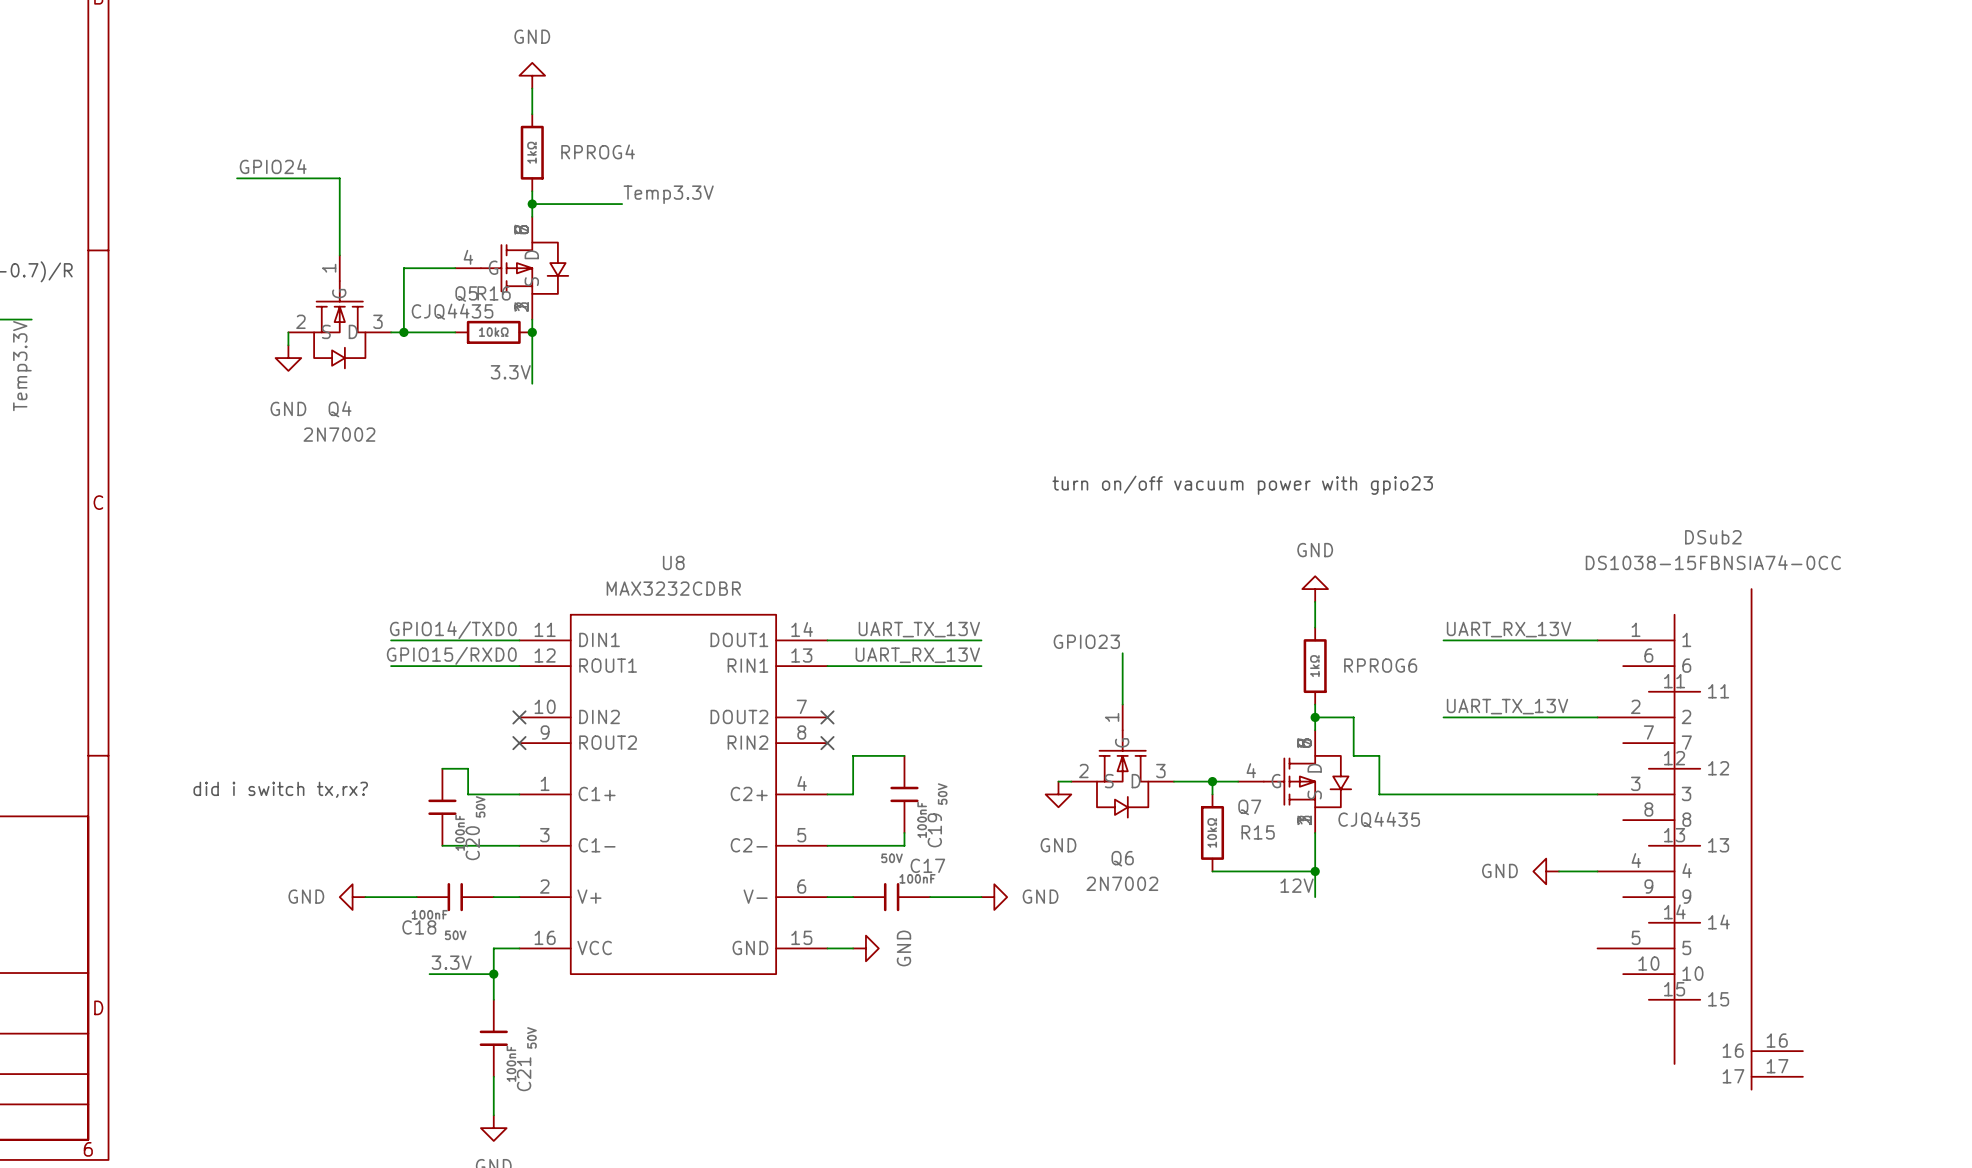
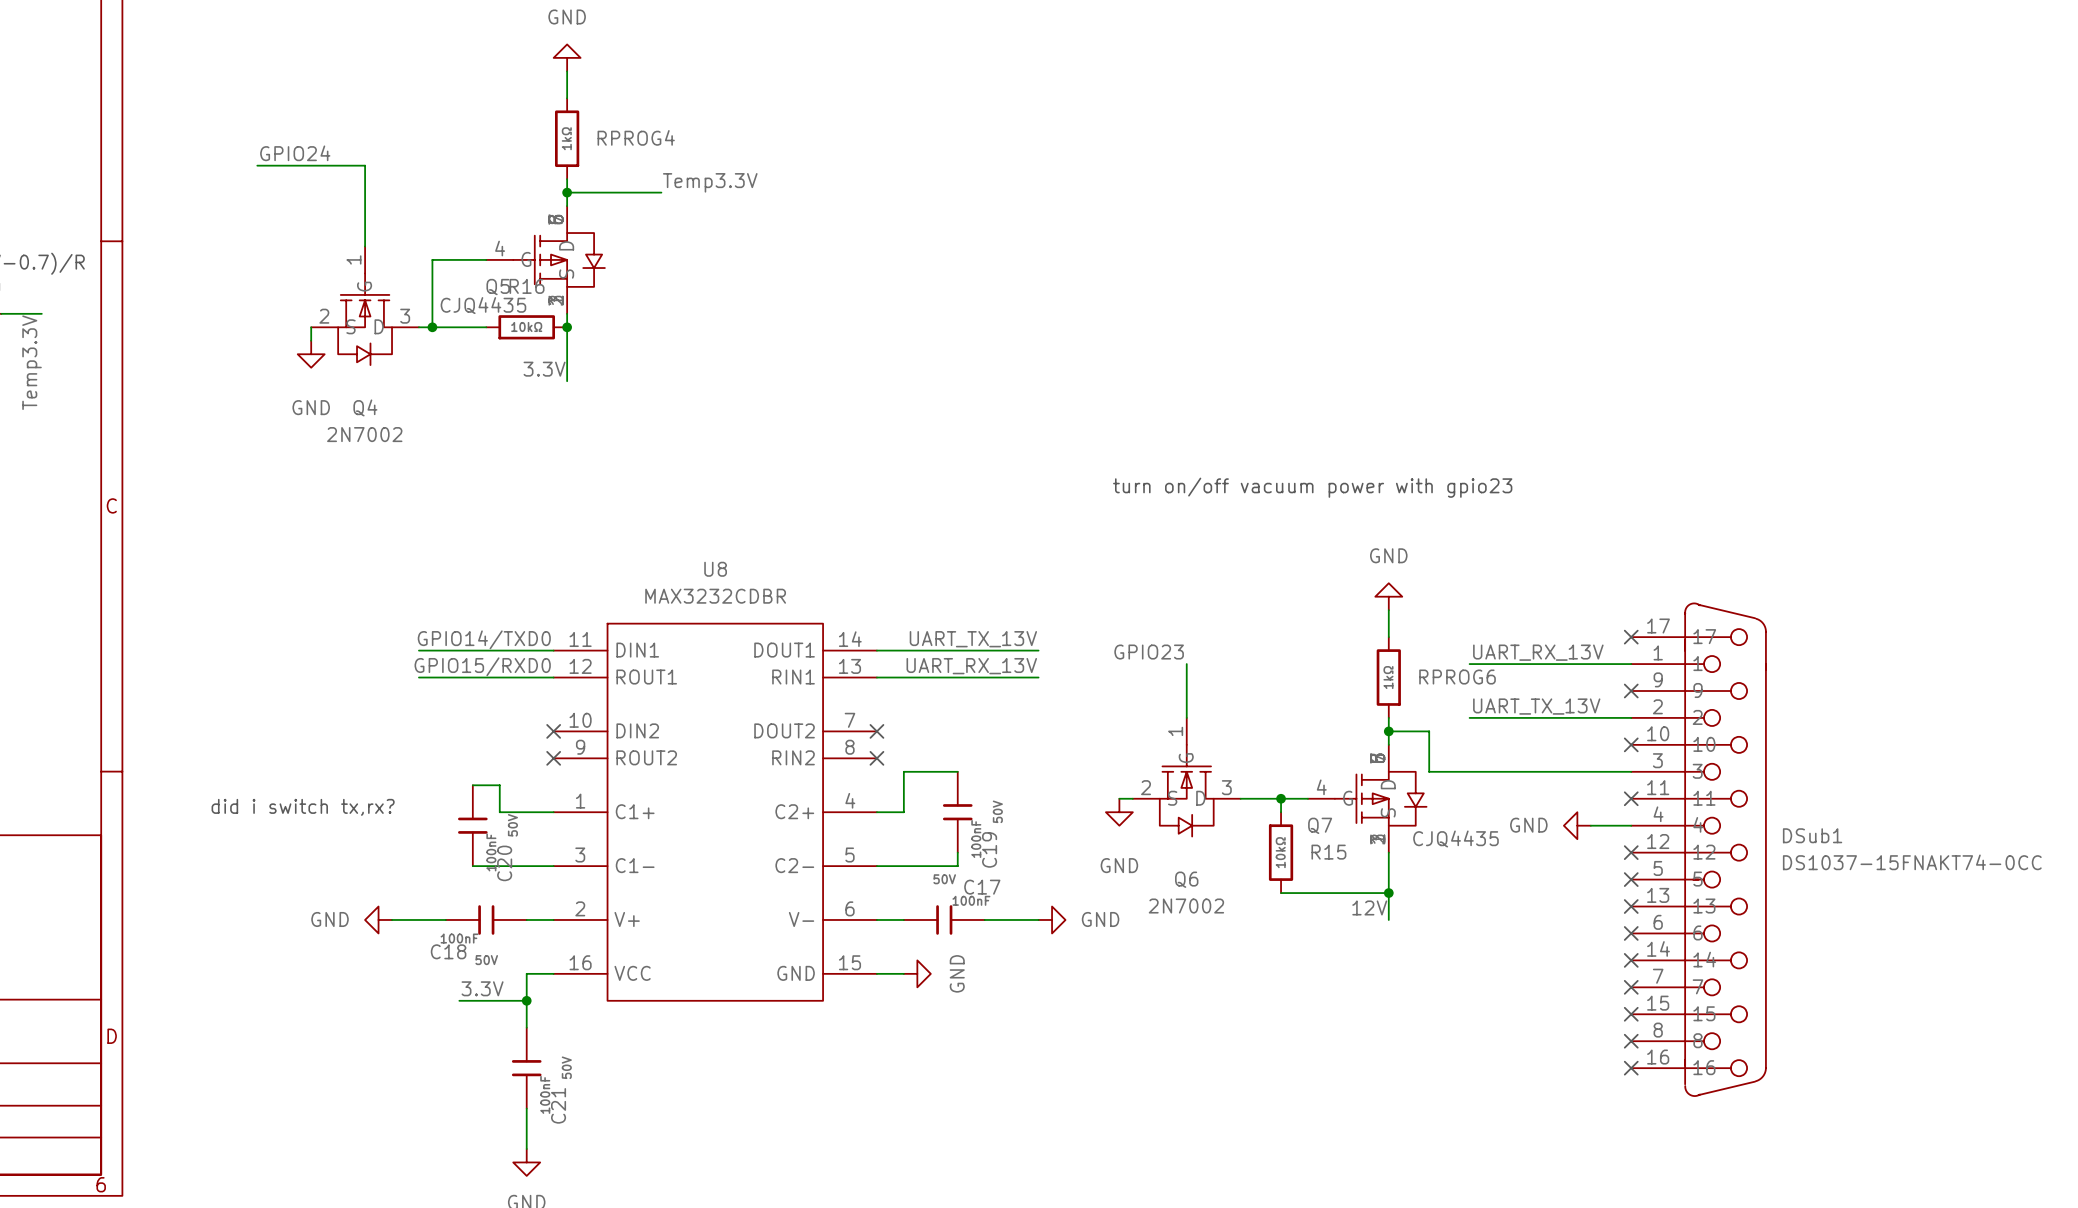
no-connect mark: none -> (1631, 637)
label position: UART_RX_13V (1509, 629) -> UART_RX_13V (1538, 652)
wire: (1443, 640) (1597, 640) -> (1469, 717) (1631, 717)
no-connect mark: none -> (1631, 691)
label position: UART_TX_13V (1507, 706) -> UART_TX_13V (1536, 706)
wire: (1443, 717) (1597, 717) -> (1469, 664) (1631, 664)
no-connect mark: none -> (1631, 744)
wire: (1379, 755) (1379, 794) (1597, 794) -> (1456, 771) (1631, 771)
no-connect mark: none -> (1631, 798)
DSub1: none -> DS1037-15FNAKT74-0CC (1698, 849)
no-connect mark: none -> (1631, 852)
DSub2: DS1038-15FBNSIA74-0CC (1700, 839) -> none
no-connect mark: none -> (1631, 879)
power symbol position: GND (1546, 871) -> GND (1577, 825)
wire: (1559, 871) (1597, 871) -> (1590, 825) (1631, 825)
no-connect mark: none -> (1631, 906)
no-connect mark: none -> (1631, 933)
no-connect mark: none -> (1631, 960)
no-connect mark: none -> (1631, 987)
no-connect mark: none -> (1631, 1014)
no-connect mark: none -> (1631, 1041)
no-connect mark: none -> (1631, 1068)

